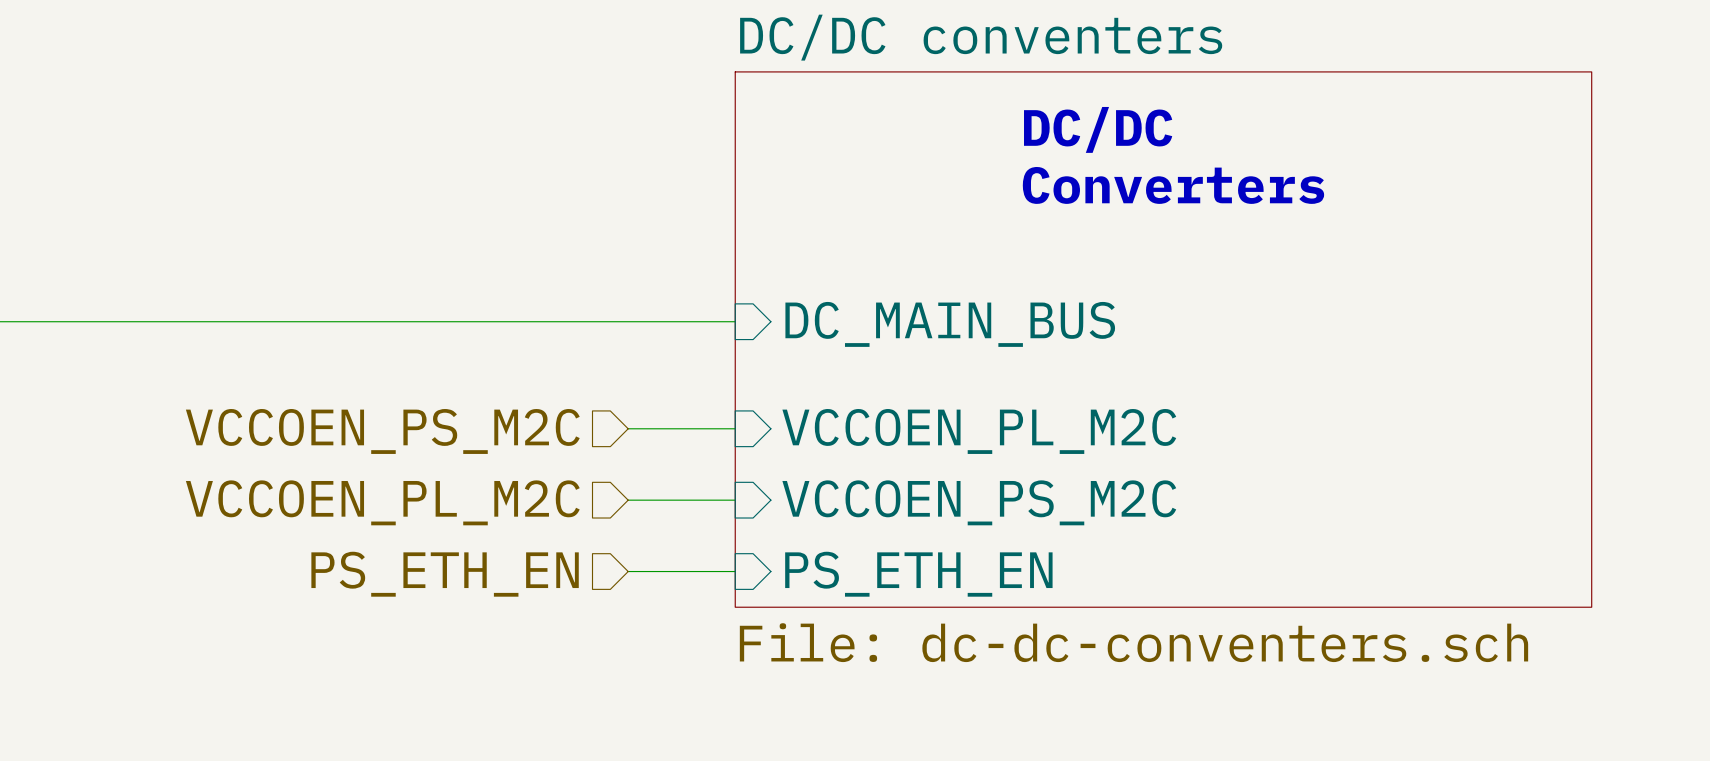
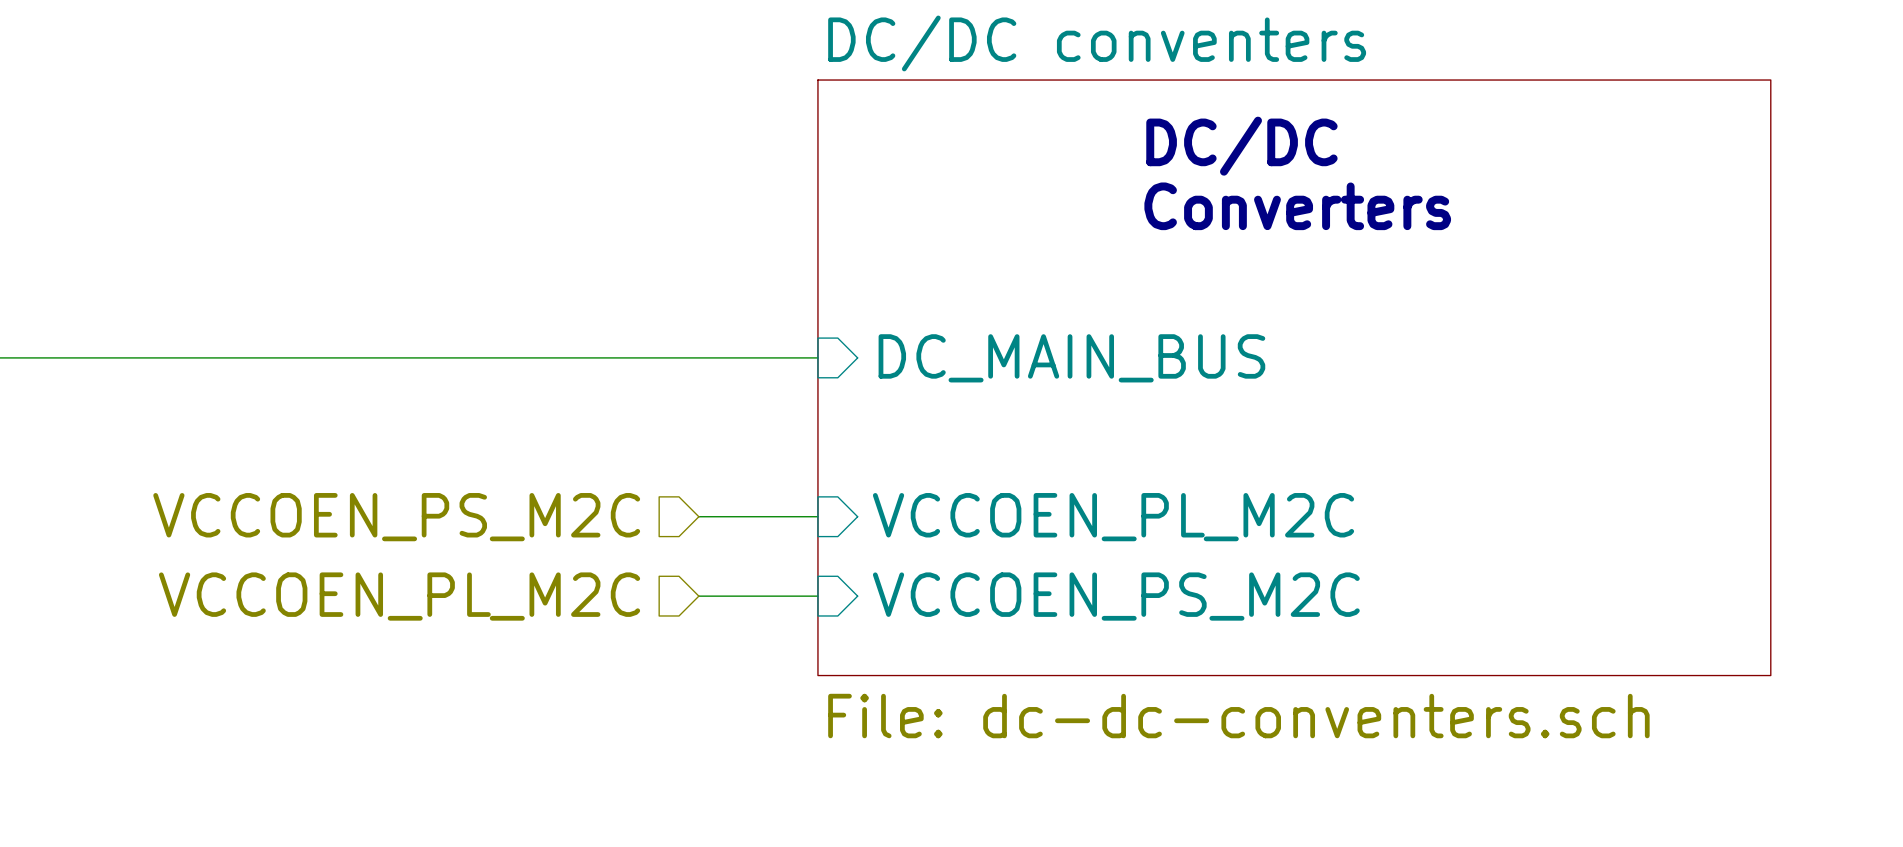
wire: (628, 428) (735, 428) -> (698, 516) (817, 516)
hierarchical label position: VCCOEN_PS_M2C (382, 431) -> VCCOEN_PS_M2C (396, 517)
sheet pin position: VCCOEN_PL_M2C (979, 431) -> VCCOEN_PL_M2C (1113, 517)
wire: (628, 500) (735, 500) -> (698, 596) (817, 596)
hierarchical label position: VCCOEN_PL_M2C (382, 502) -> VCCOEN_PL_M2C (399, 596)
sheet pin position: VCCOEN_PS_M2C (979, 502) -> VCCOEN_PS_M2C (1116, 596)
wire: (628, 571) (735, 571) -> none
hierarchical label: PS_ETH_EN (445, 574) -> none
sheet pin: PS_ETH_EN (918, 574) -> none

